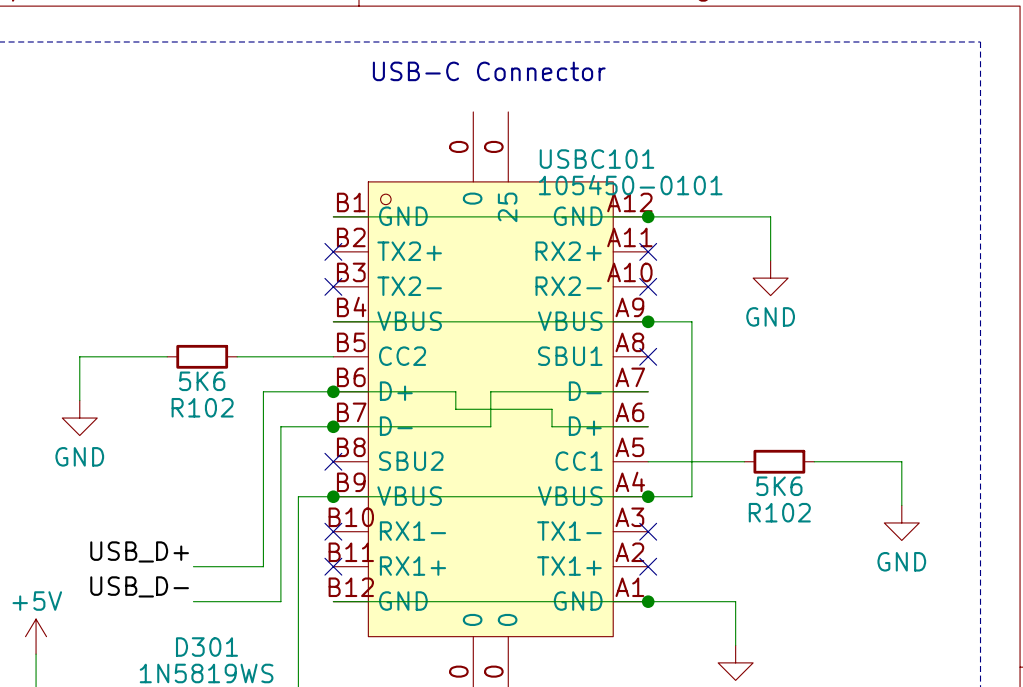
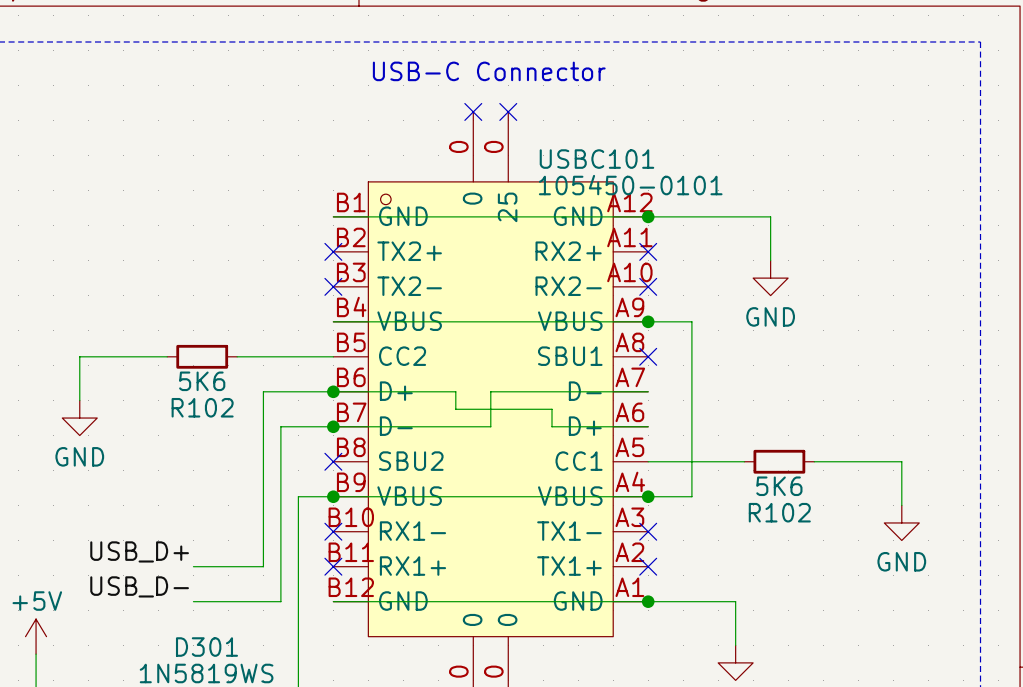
no-connect mark: none -> (473, 111)
no-connect mark: none -> (508, 111)

